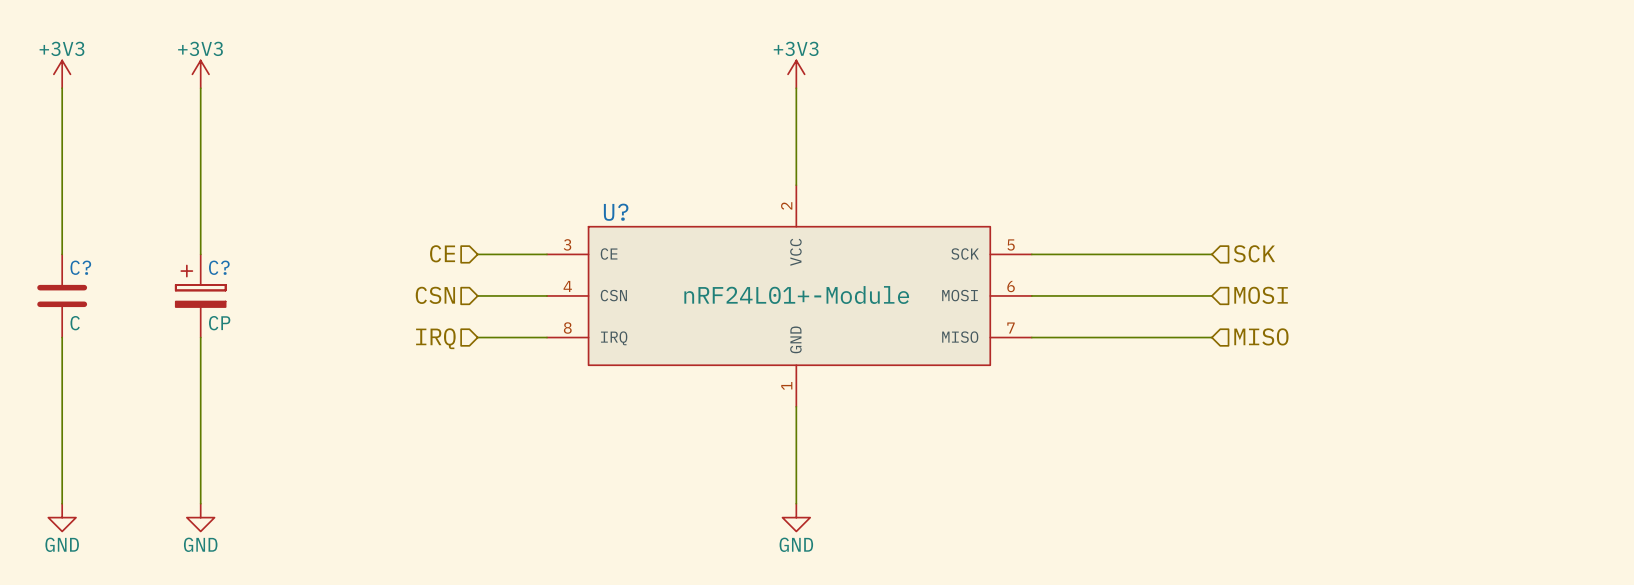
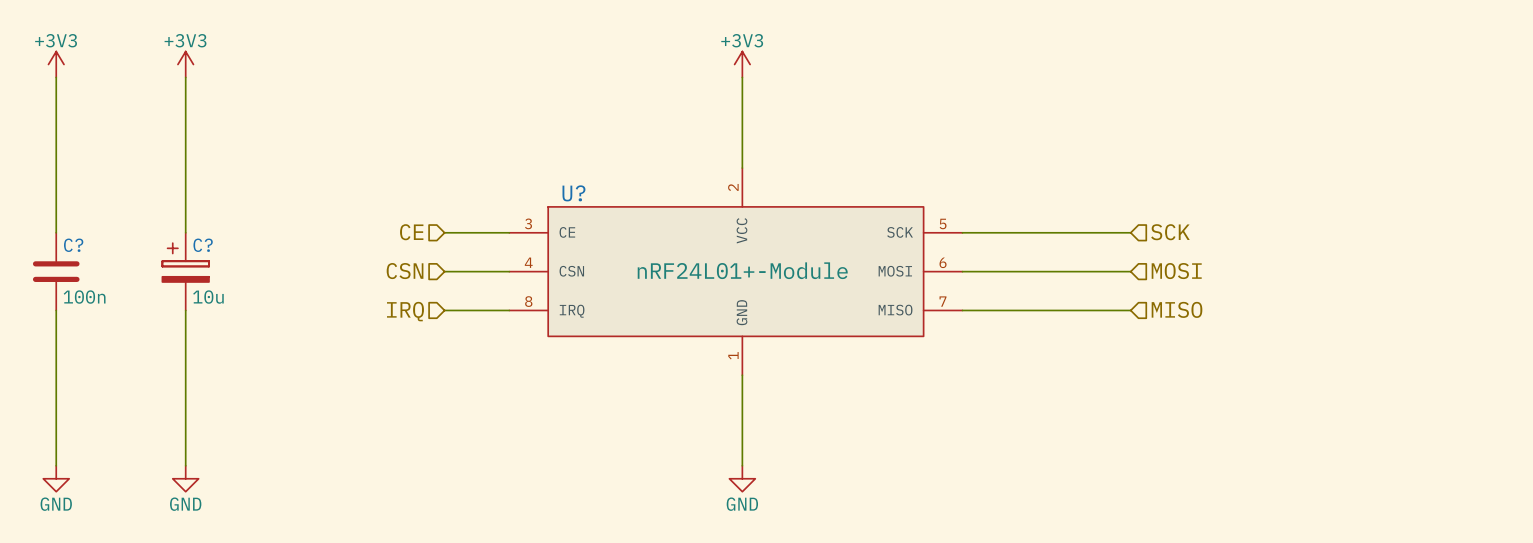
C? value: C (75, 323) -> 100n (84, 297)
C? value: CP (219, 323) -> 10u (208, 297)

